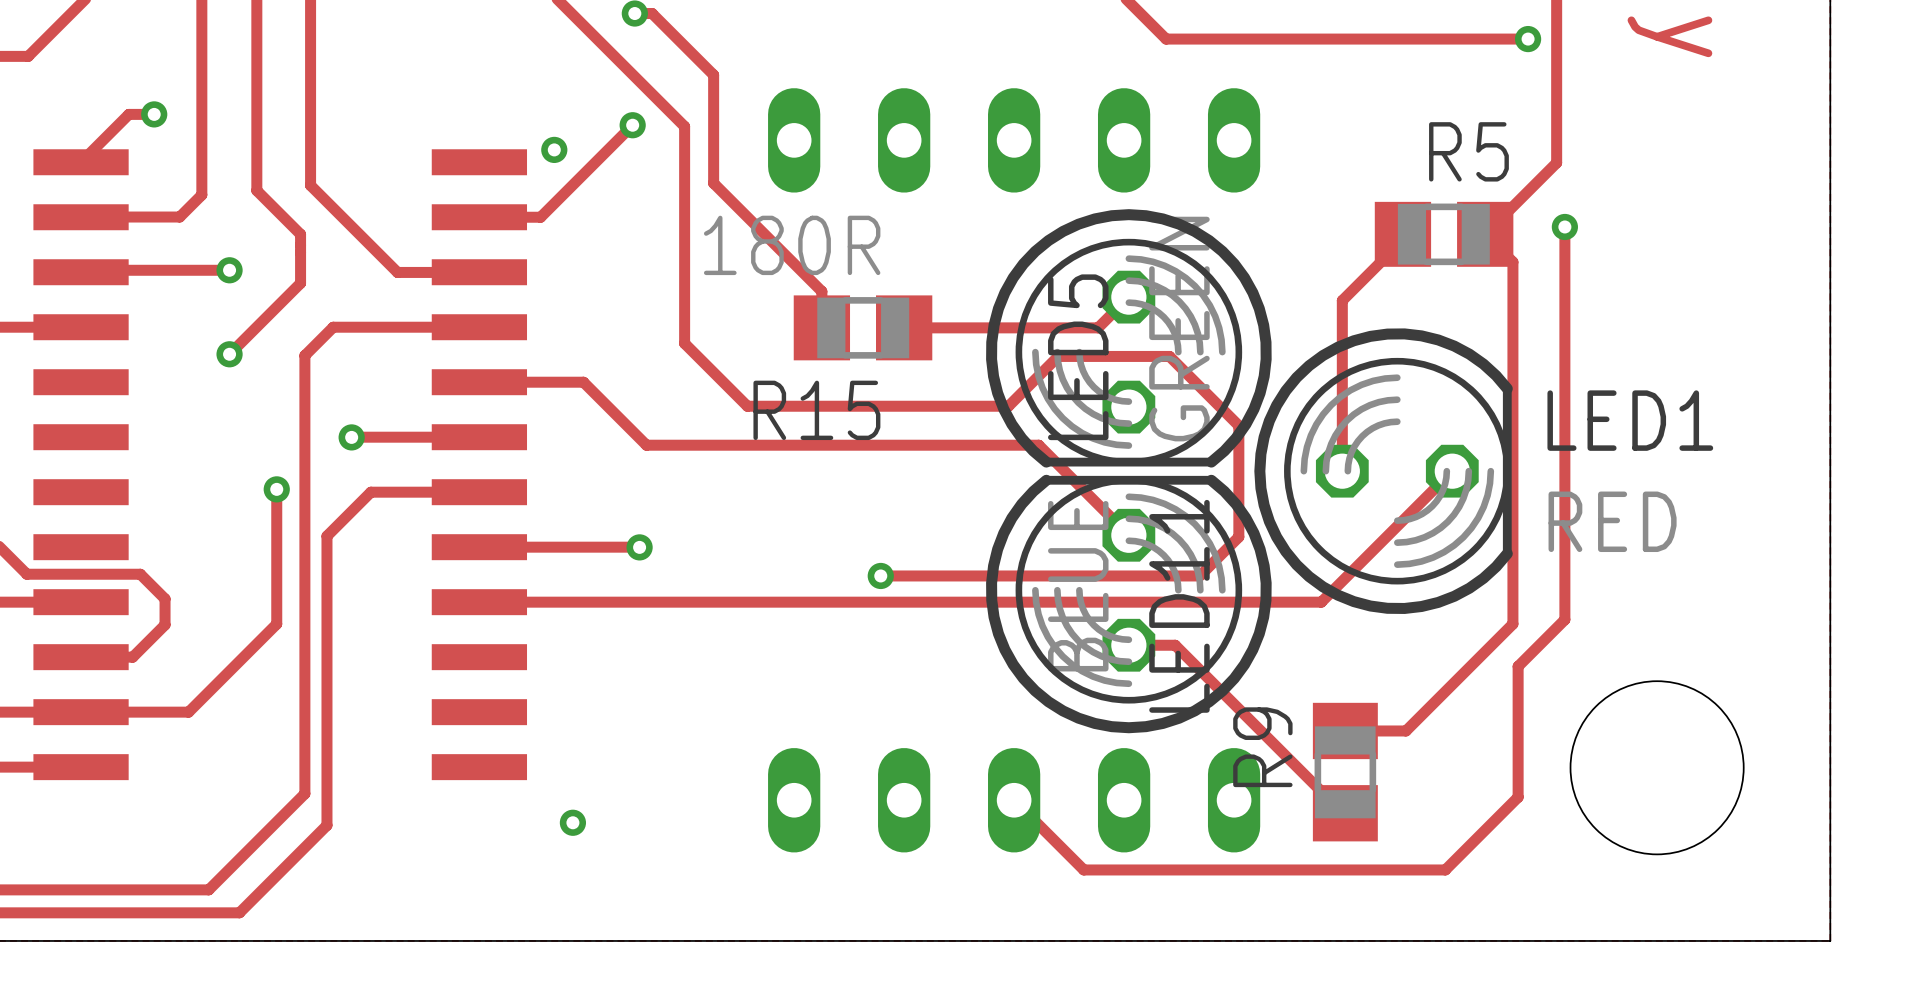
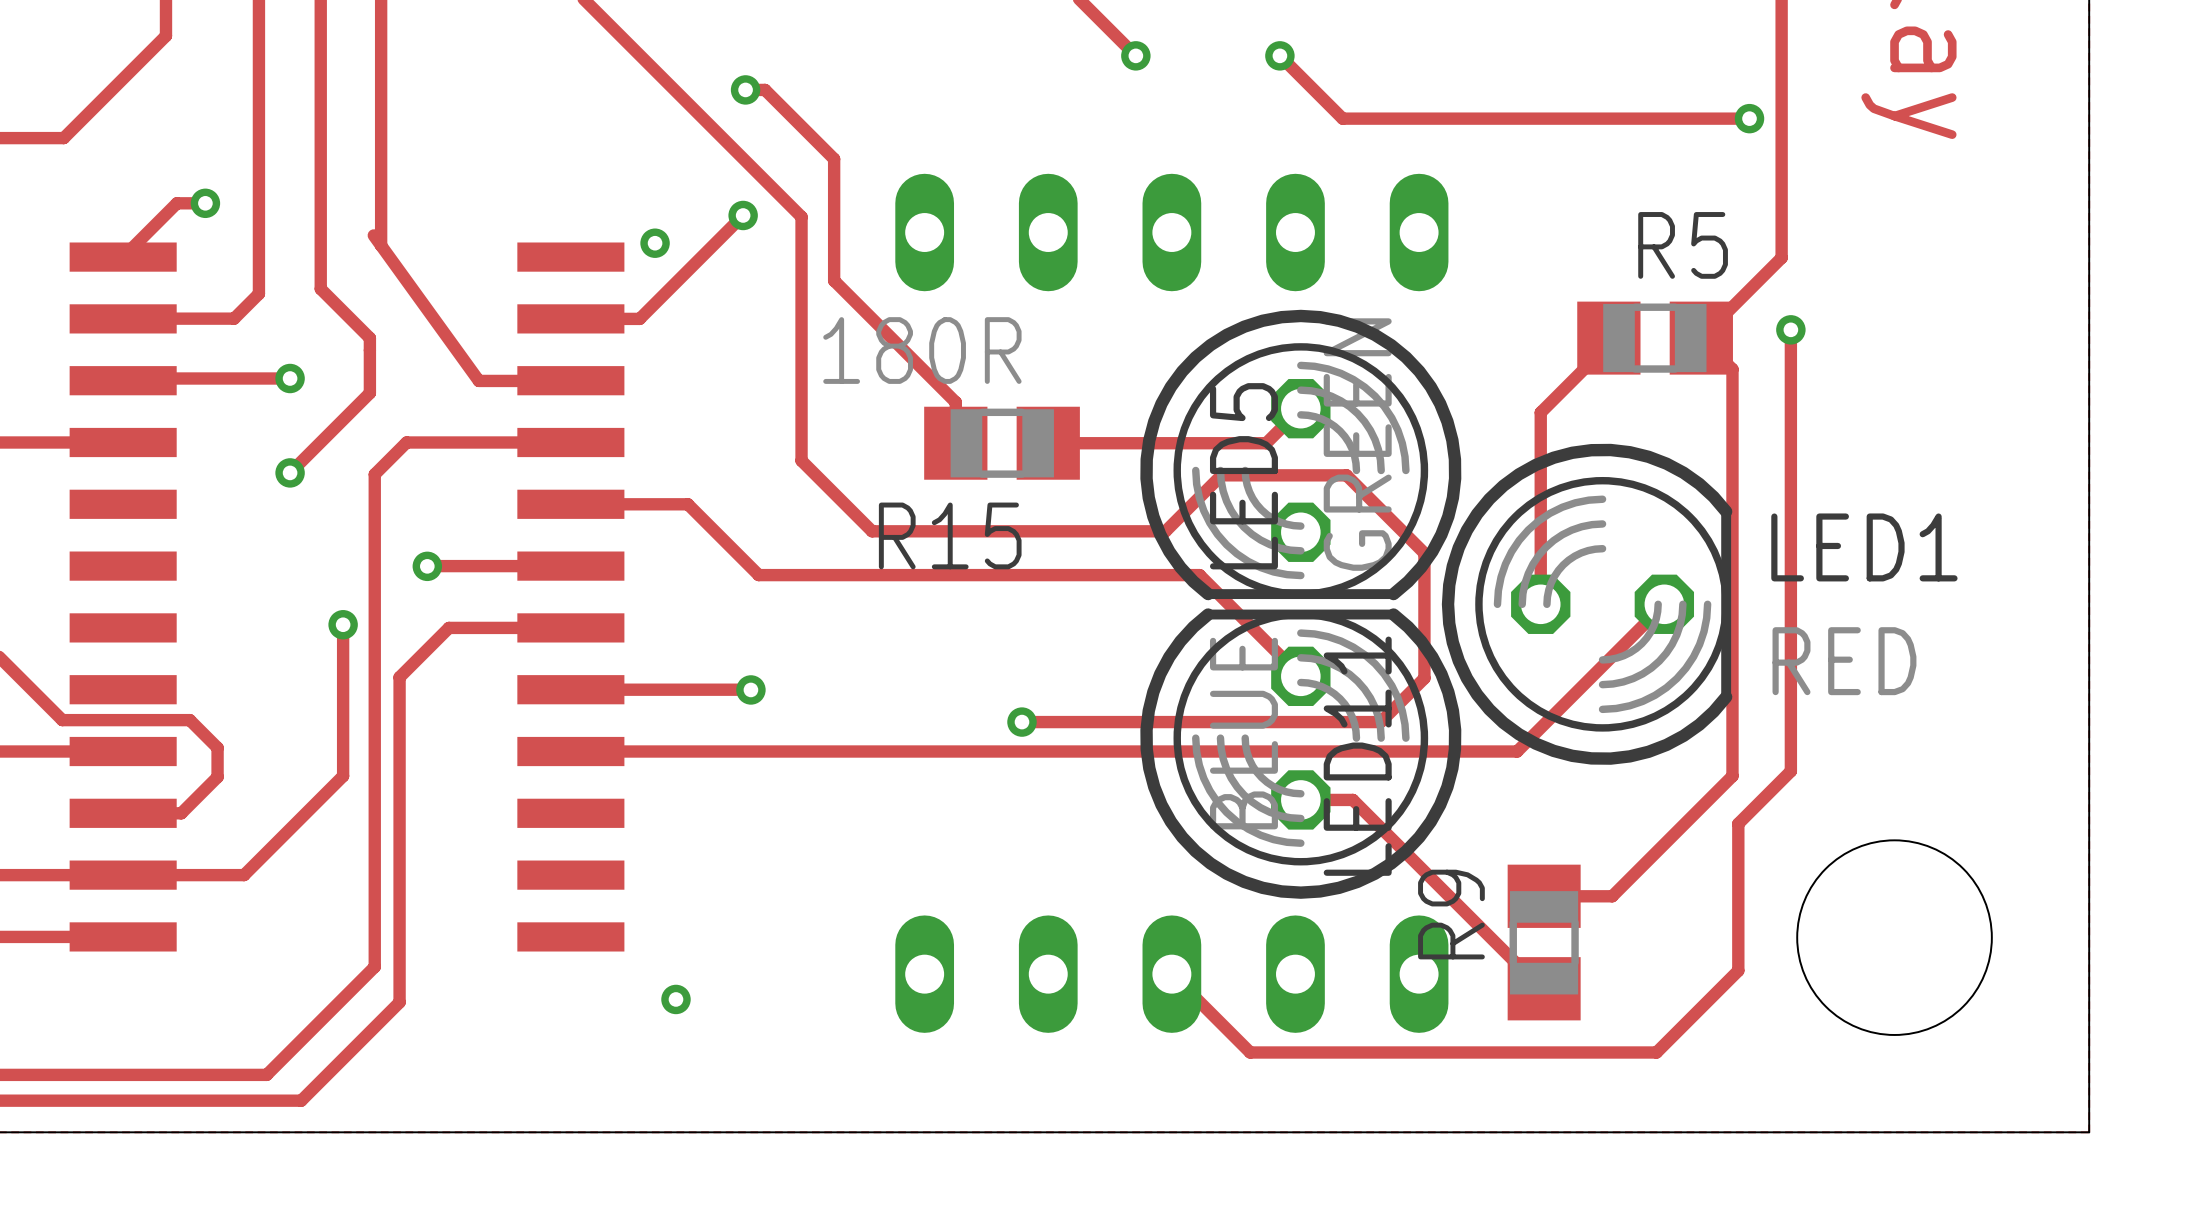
track: (310, 152) (310, 185) (397, 272) -> (373, 235) (478, 380)

